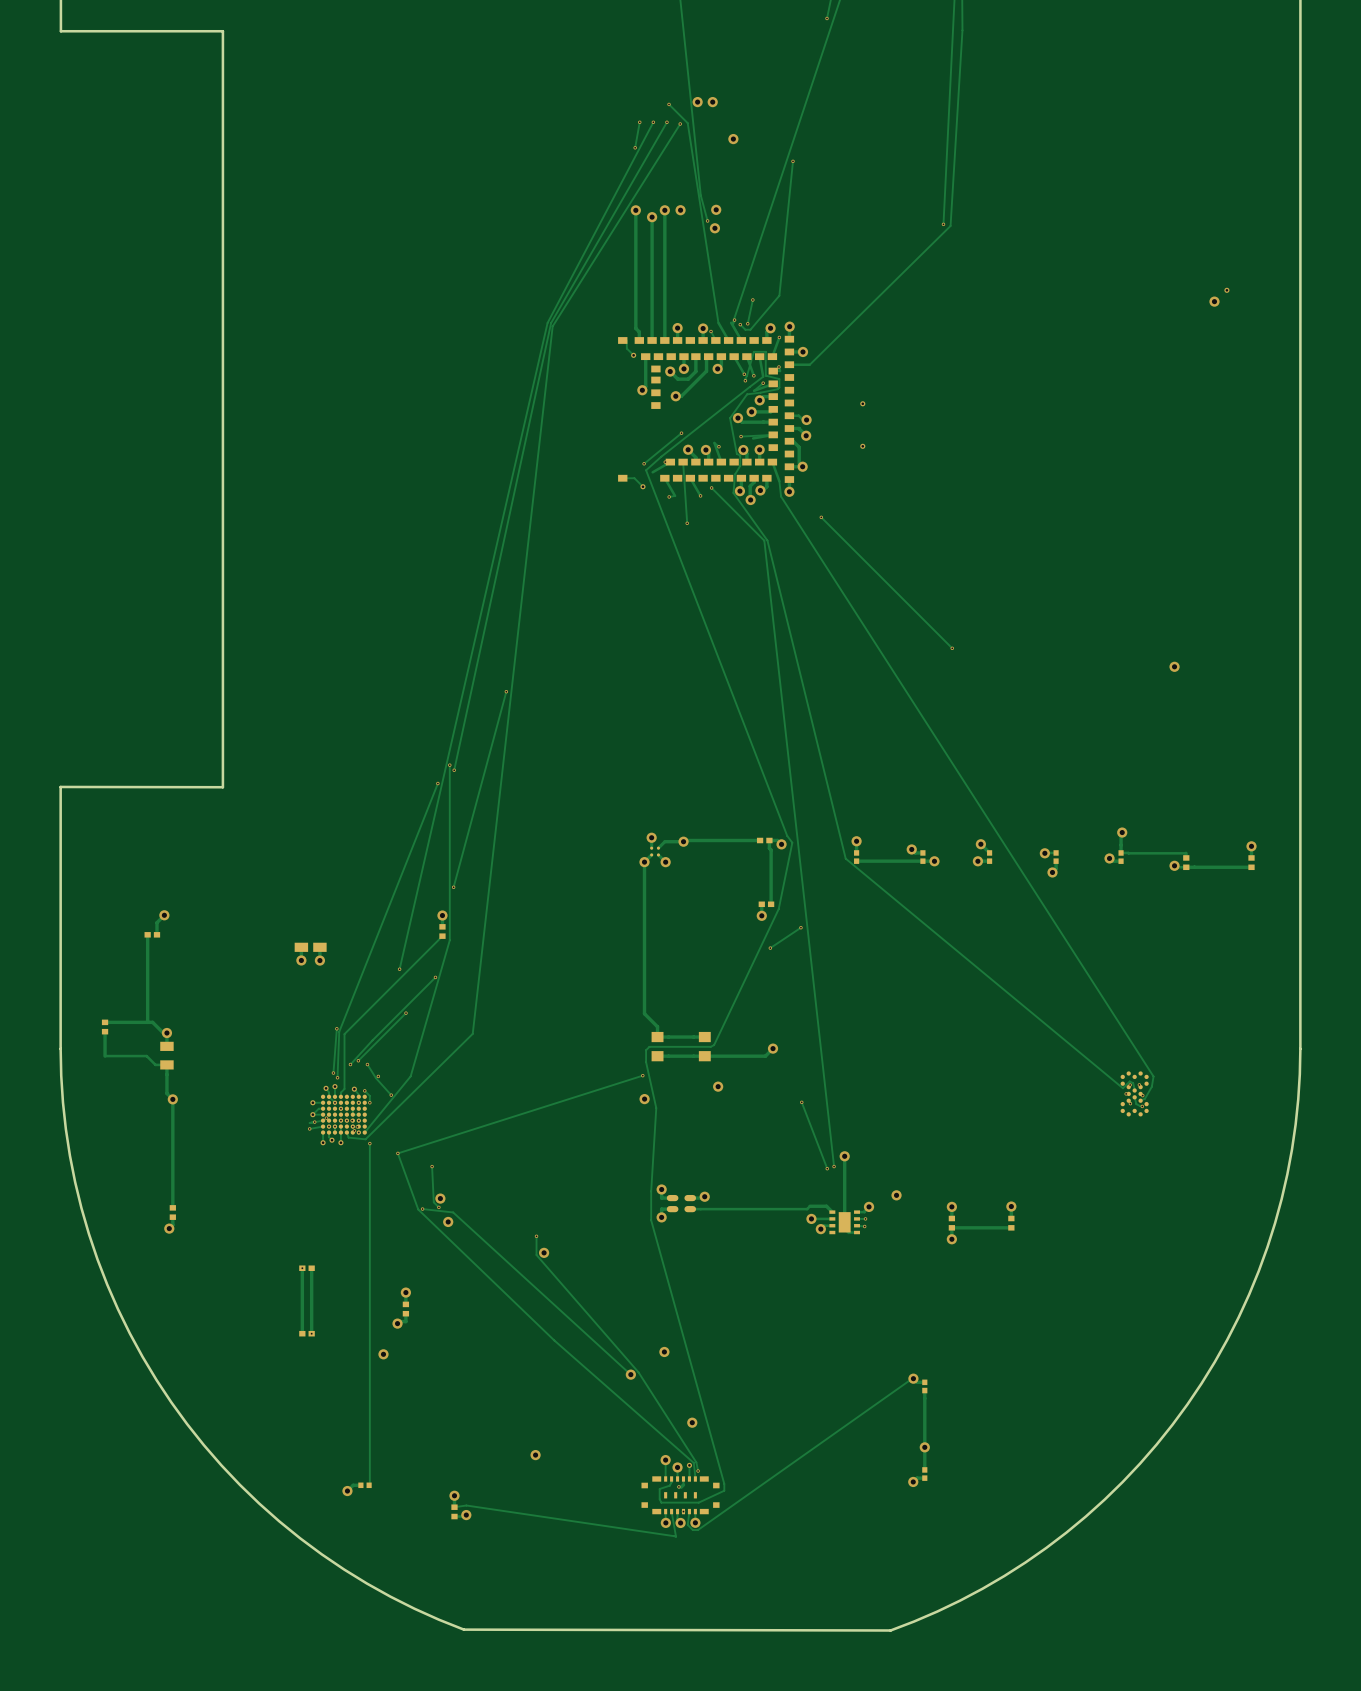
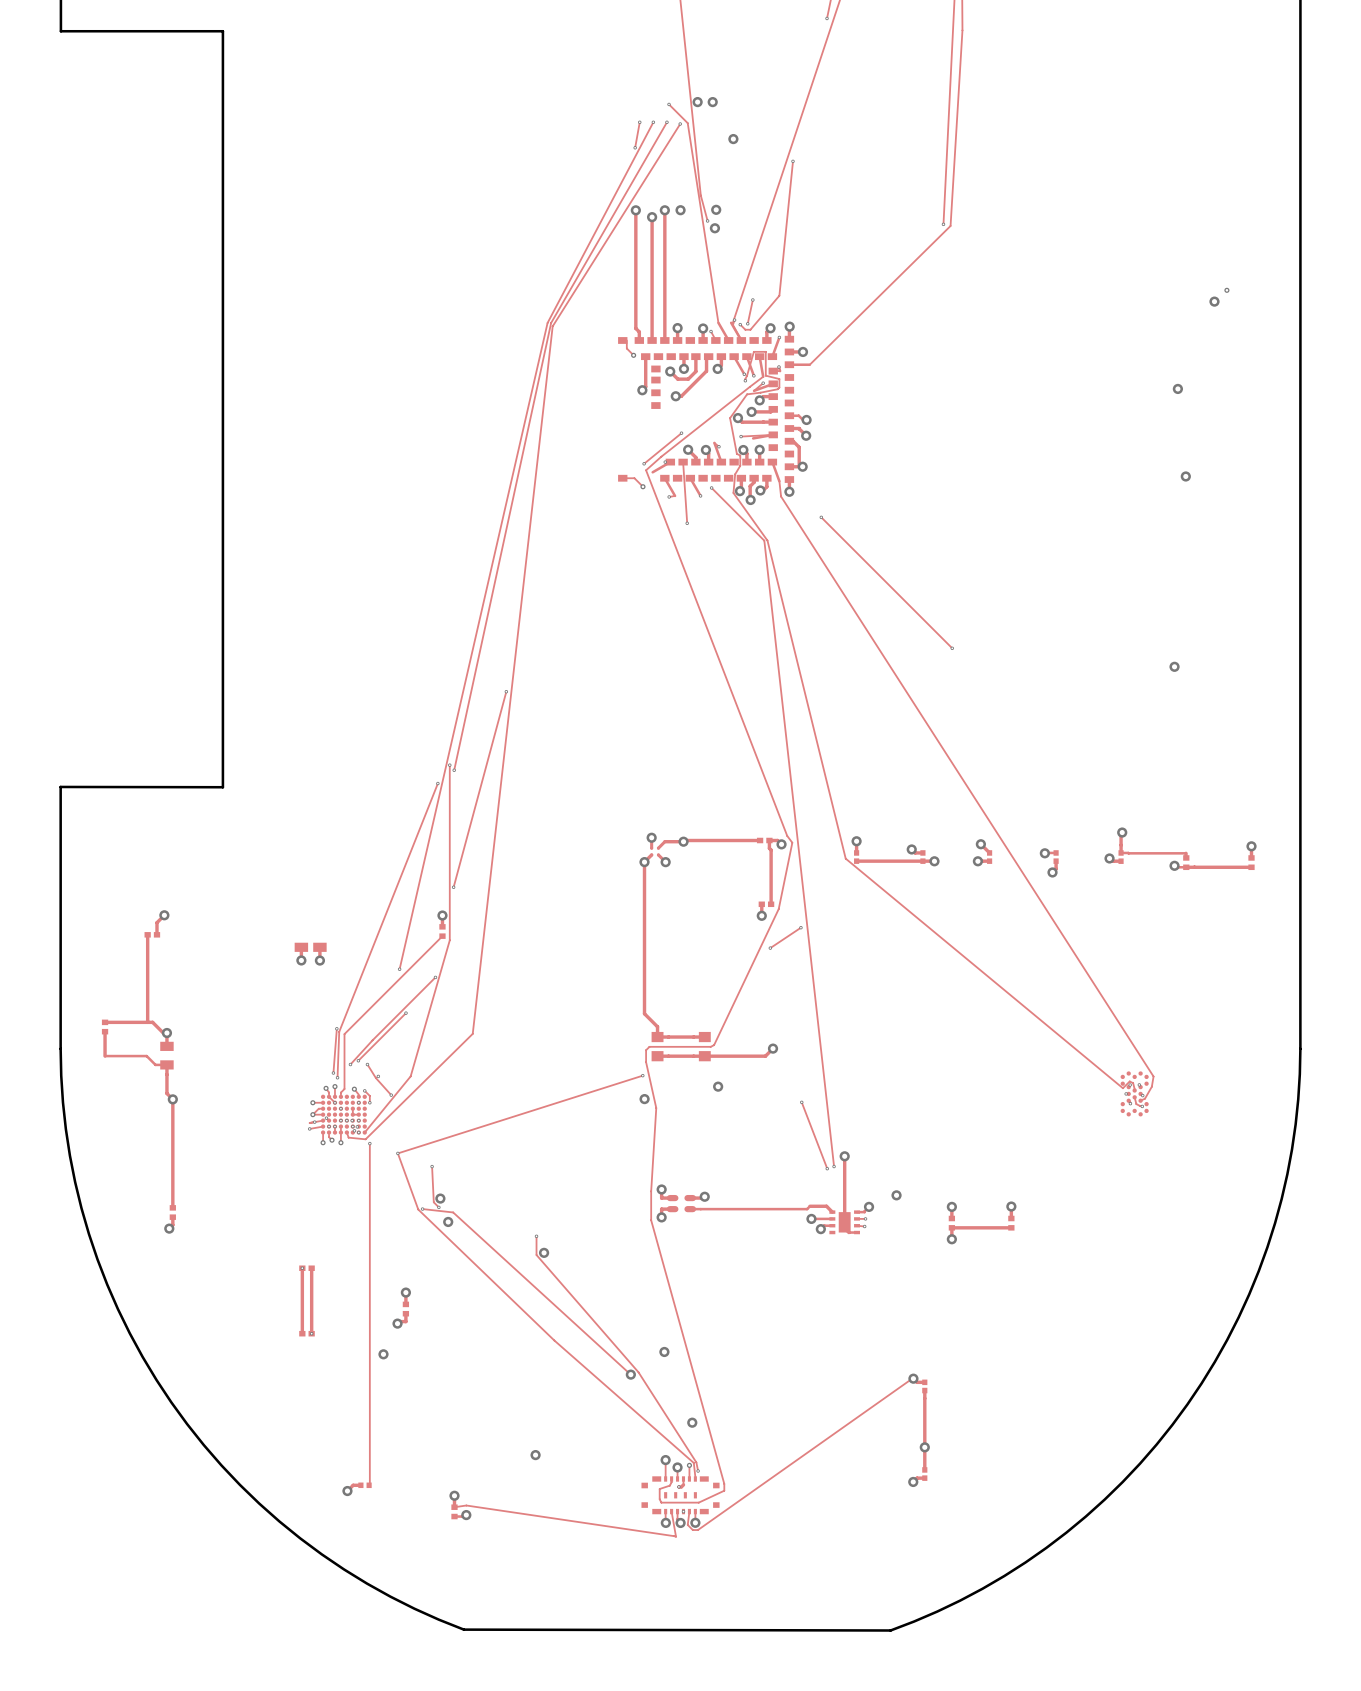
via: none -> (1177, 388)
via: (862, 403) -> none
via: (862, 446) -> none
via: none -> (1185, 476)

